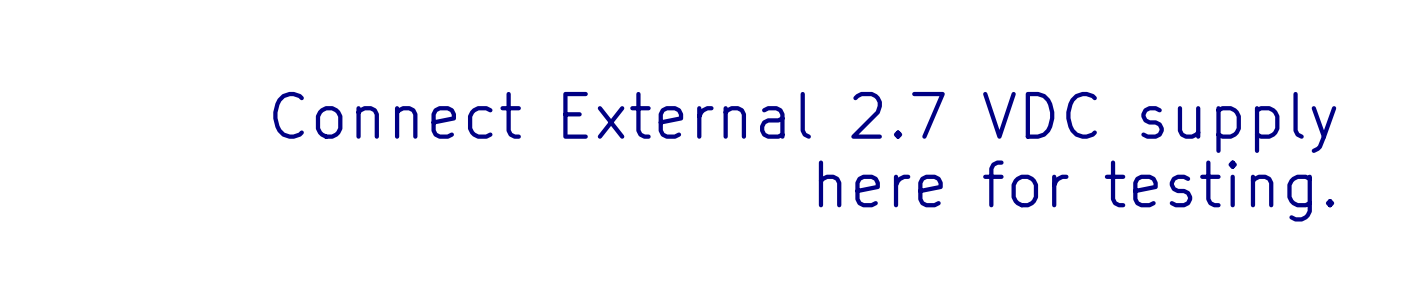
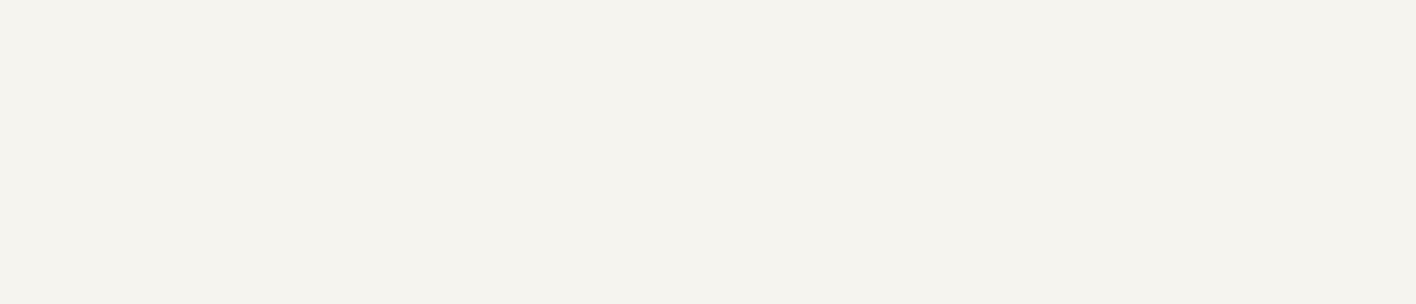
text: Connect External 2.7 VDC supply (804, 122) -> none
text: here for testing. (1076, 191) -> none

